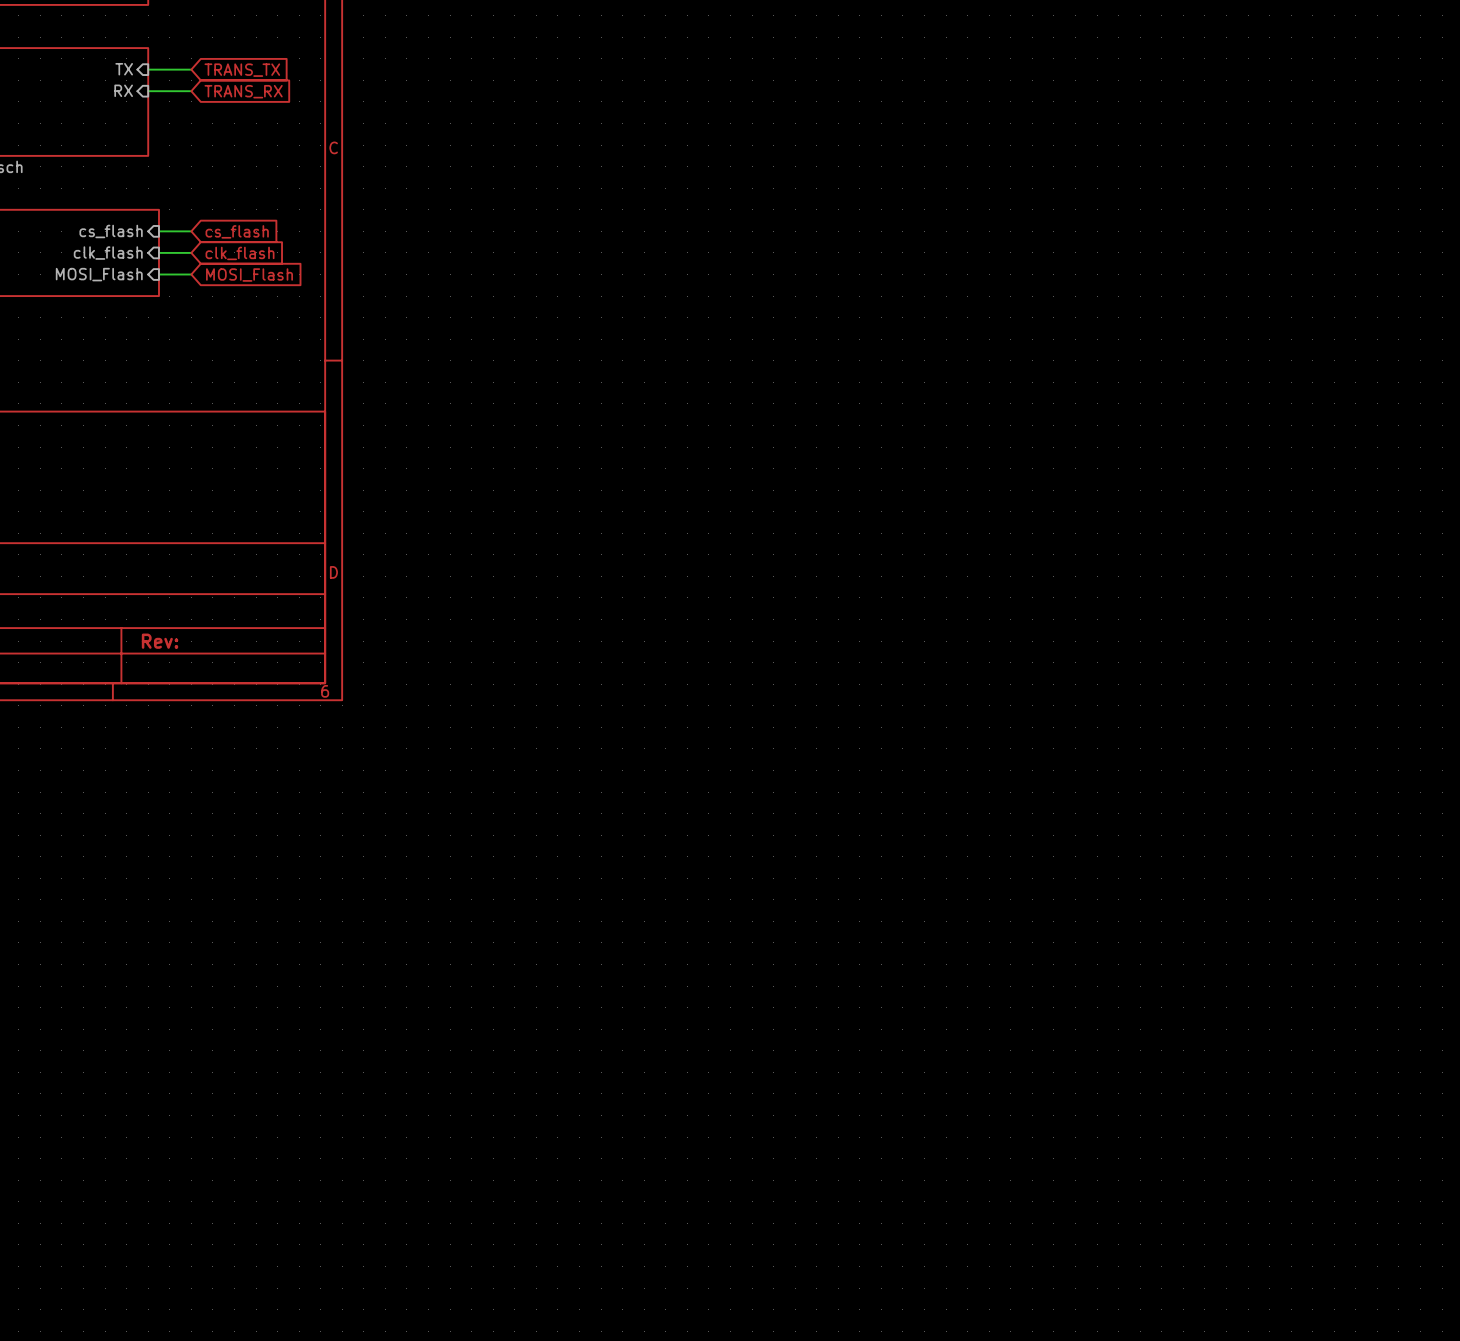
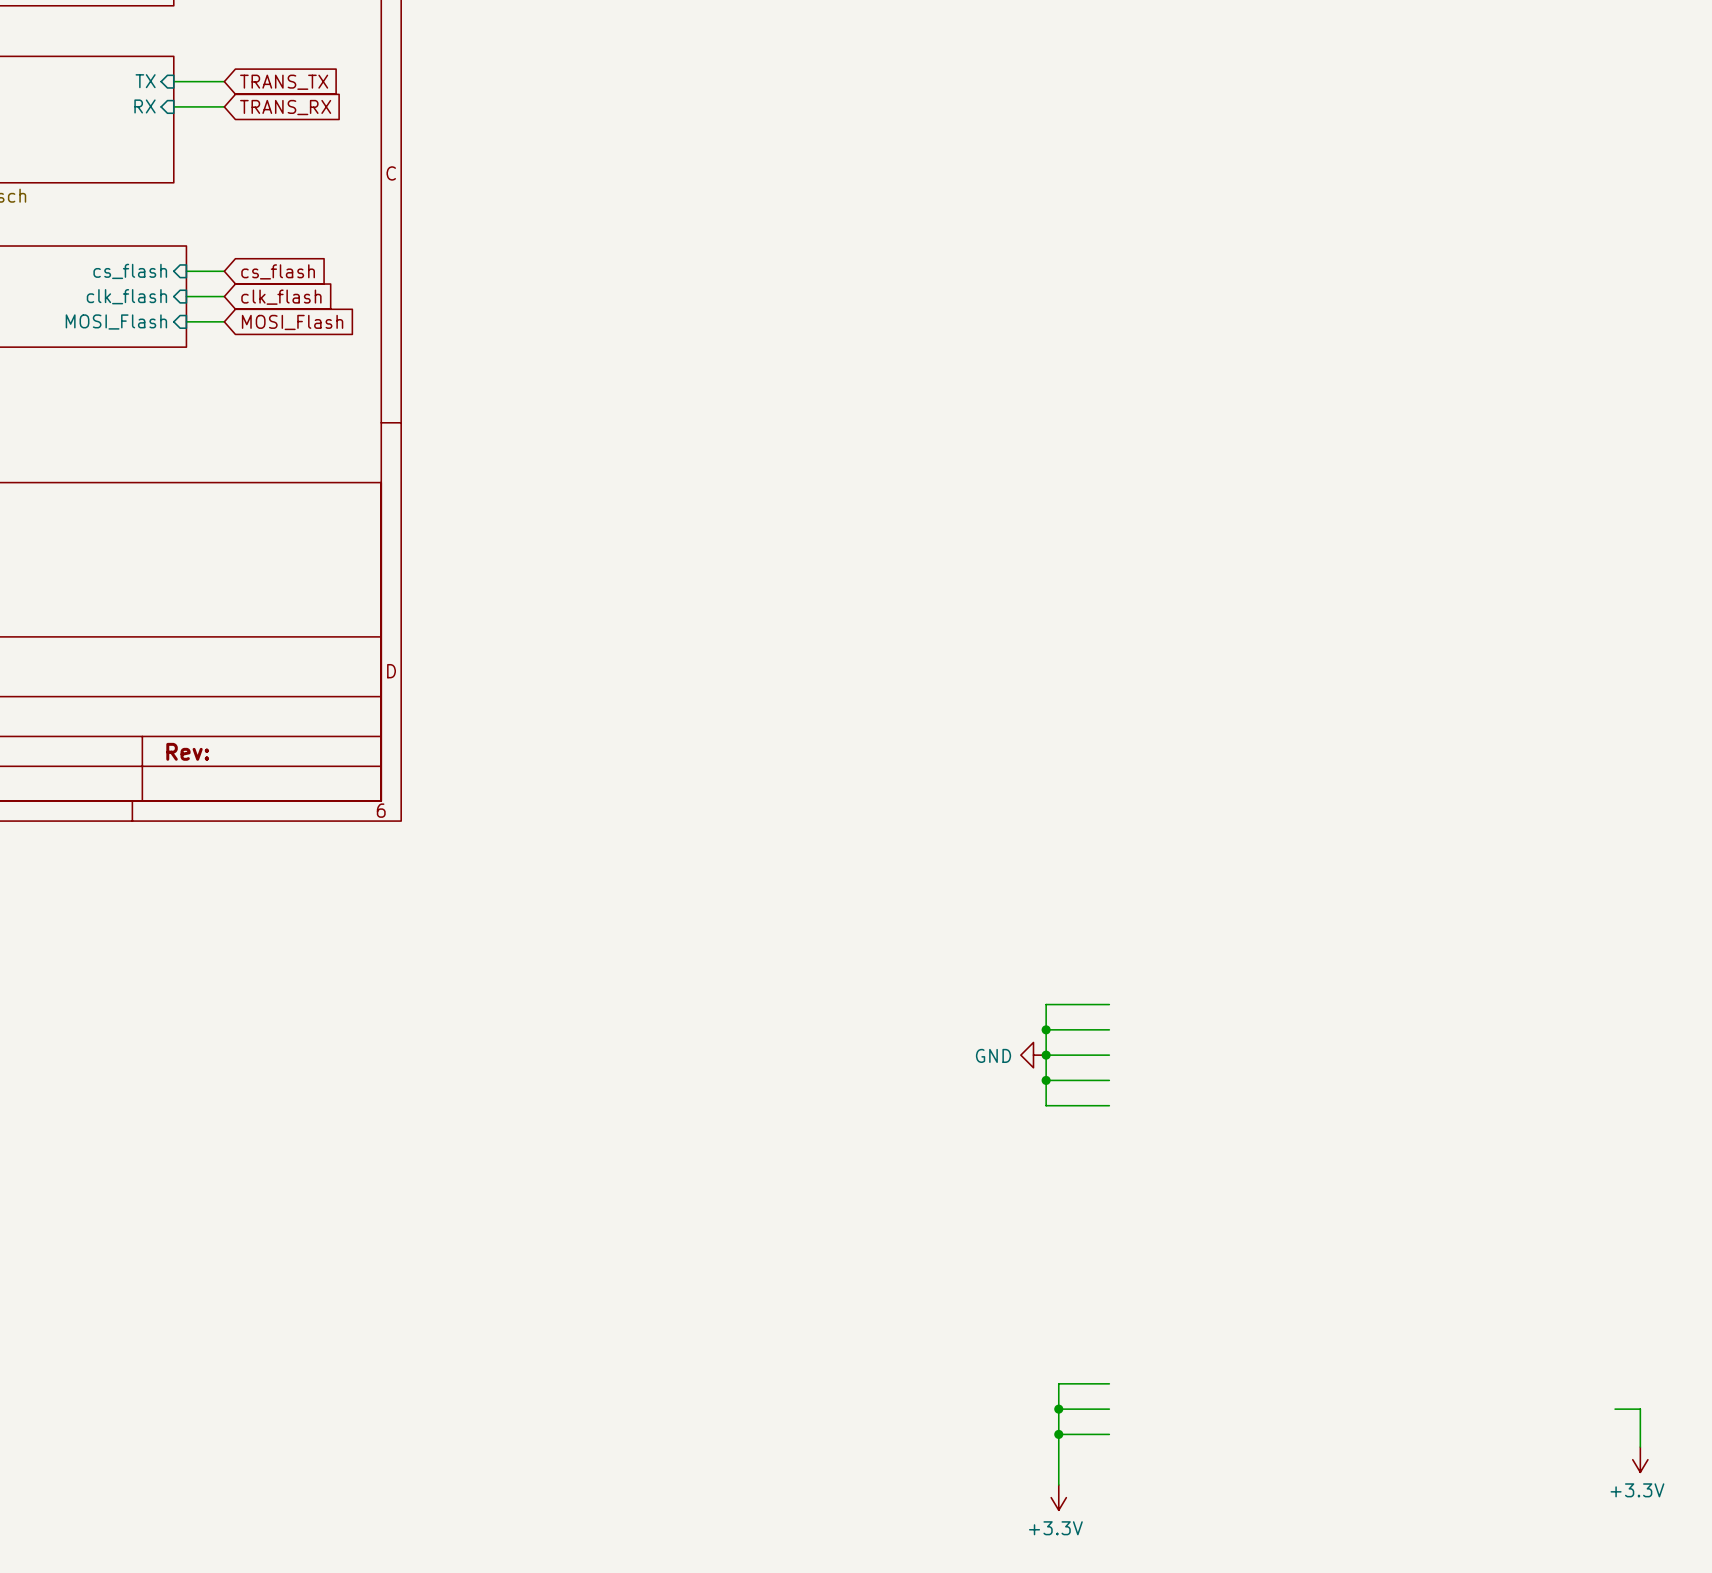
wire: none -> (1109, 1004) (1046, 1004) (1046, 1105) (1109, 1105)
wire: none -> (1046, 1029) (1109, 1029)
junction: none -> (1046, 1029)
power symbol: none -> GND (1033, 1055)
wire: none -> (1046, 1055) (1109, 1055)
junction: none -> (1046, 1055)
wire: none -> (1046, 1080) (1109, 1080)
junction: none -> (1046, 1080)
wire: none -> (1109, 1383) (1058, 1383) (1058, 1484)
wire: none -> (1058, 1409) (1109, 1409)
junction: none -> (1058, 1409)
wire: none -> (1615, 1409) (1640, 1409) (1640, 1447)
wire: none -> (1058, 1434) (1109, 1434)
junction: none -> (1058, 1434)
power symbol: none -> +3.3V (1640, 1459)
power symbol: none -> +3.3V (1058, 1497)

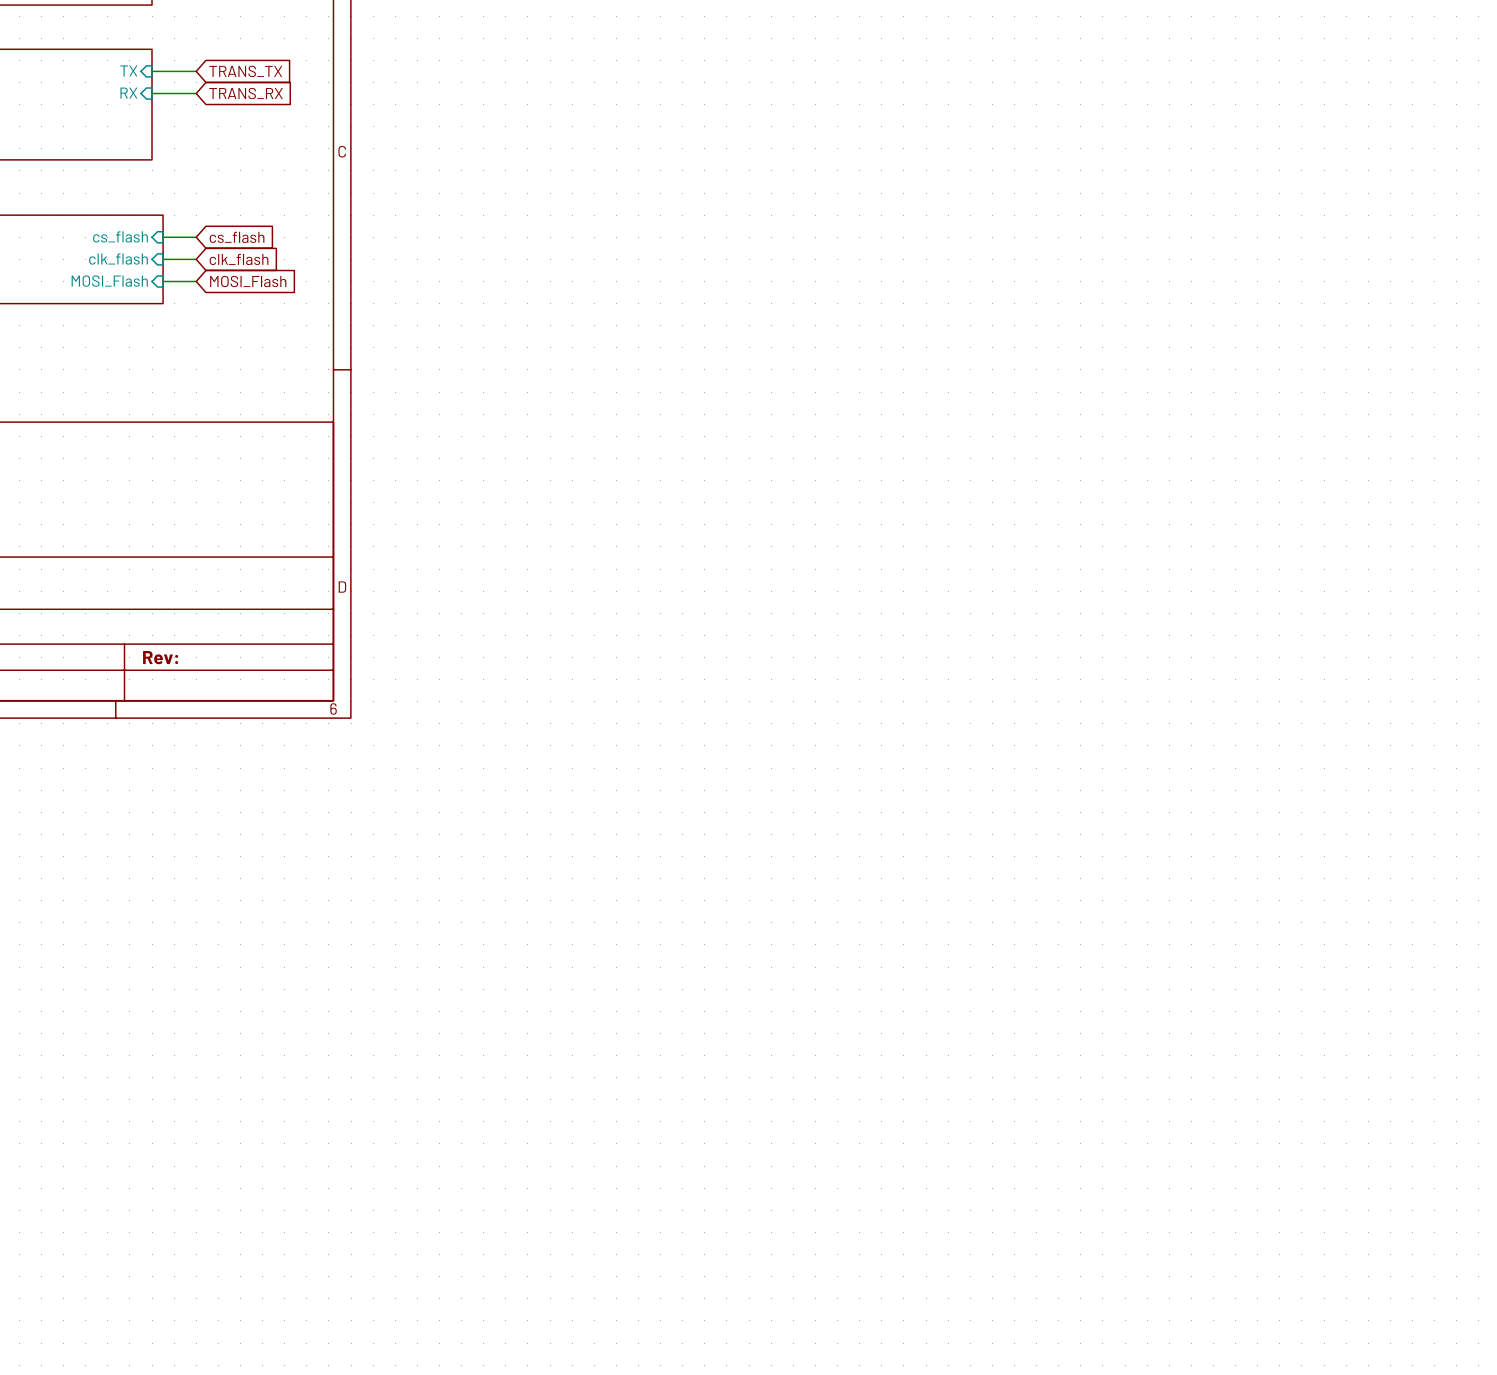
wire: (1109, 1004) (1046, 1004) (1046, 1105) (1109, 1105) -> none
wire: (1046, 1029) (1109, 1029) -> none
junction: (1046, 1029) -> none
power symbol: GND (1033, 1055) -> none
wire: (1046, 1055) (1109, 1055) -> none
junction: (1046, 1055) -> none
wire: (1046, 1080) (1109, 1080) -> none
junction: (1046, 1080) -> none
wire: (1109, 1383) (1058, 1383) (1058, 1484) -> none
wire: (1058, 1409) (1109, 1409) -> none
junction: (1058, 1409) -> none
wire: (1615, 1409) (1640, 1409) (1640, 1447) -> none
wire: (1058, 1434) (1109, 1434) -> none
junction: (1058, 1434) -> none
power symbol: +3.3V (1640, 1459) -> none
power symbol: +3.3V (1058, 1497) -> none

